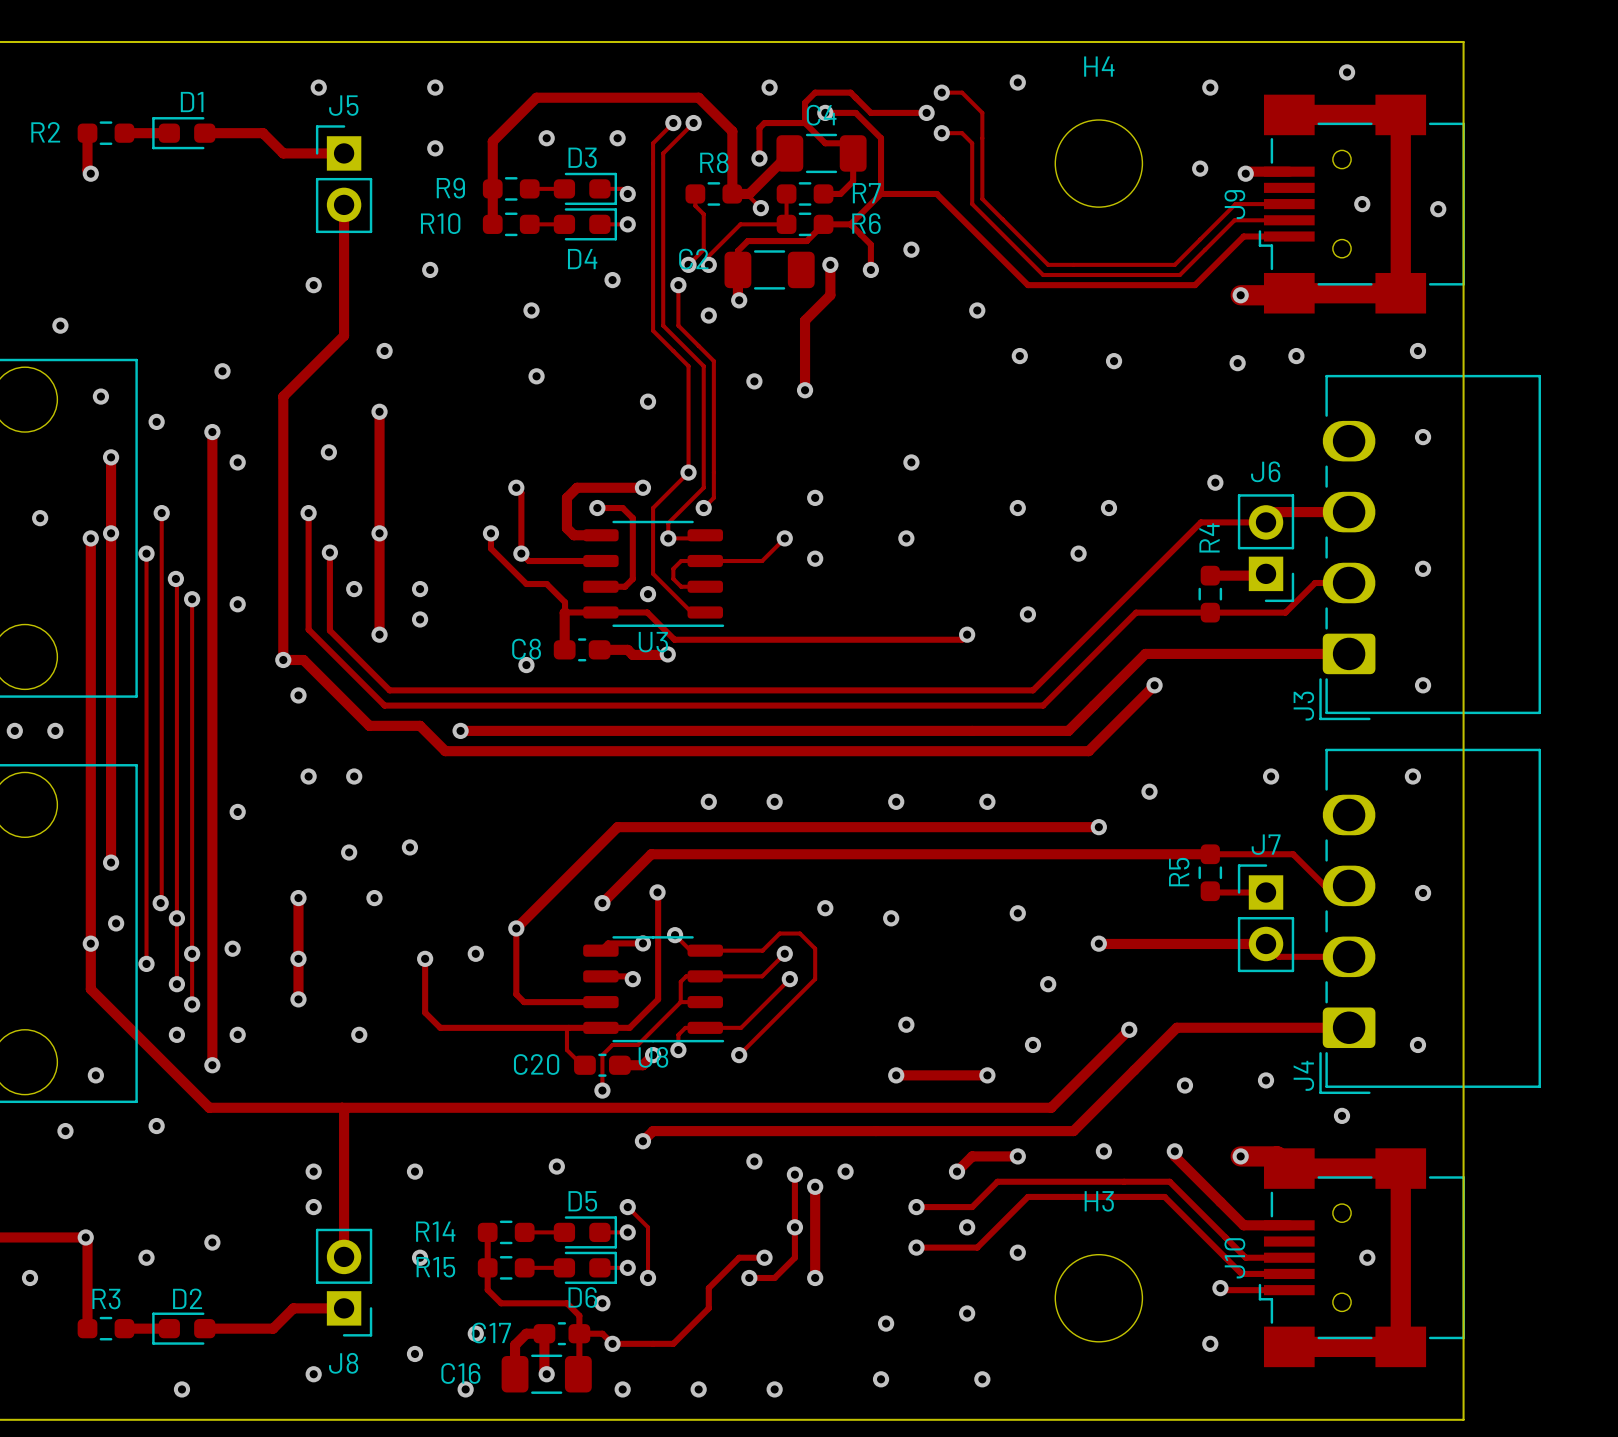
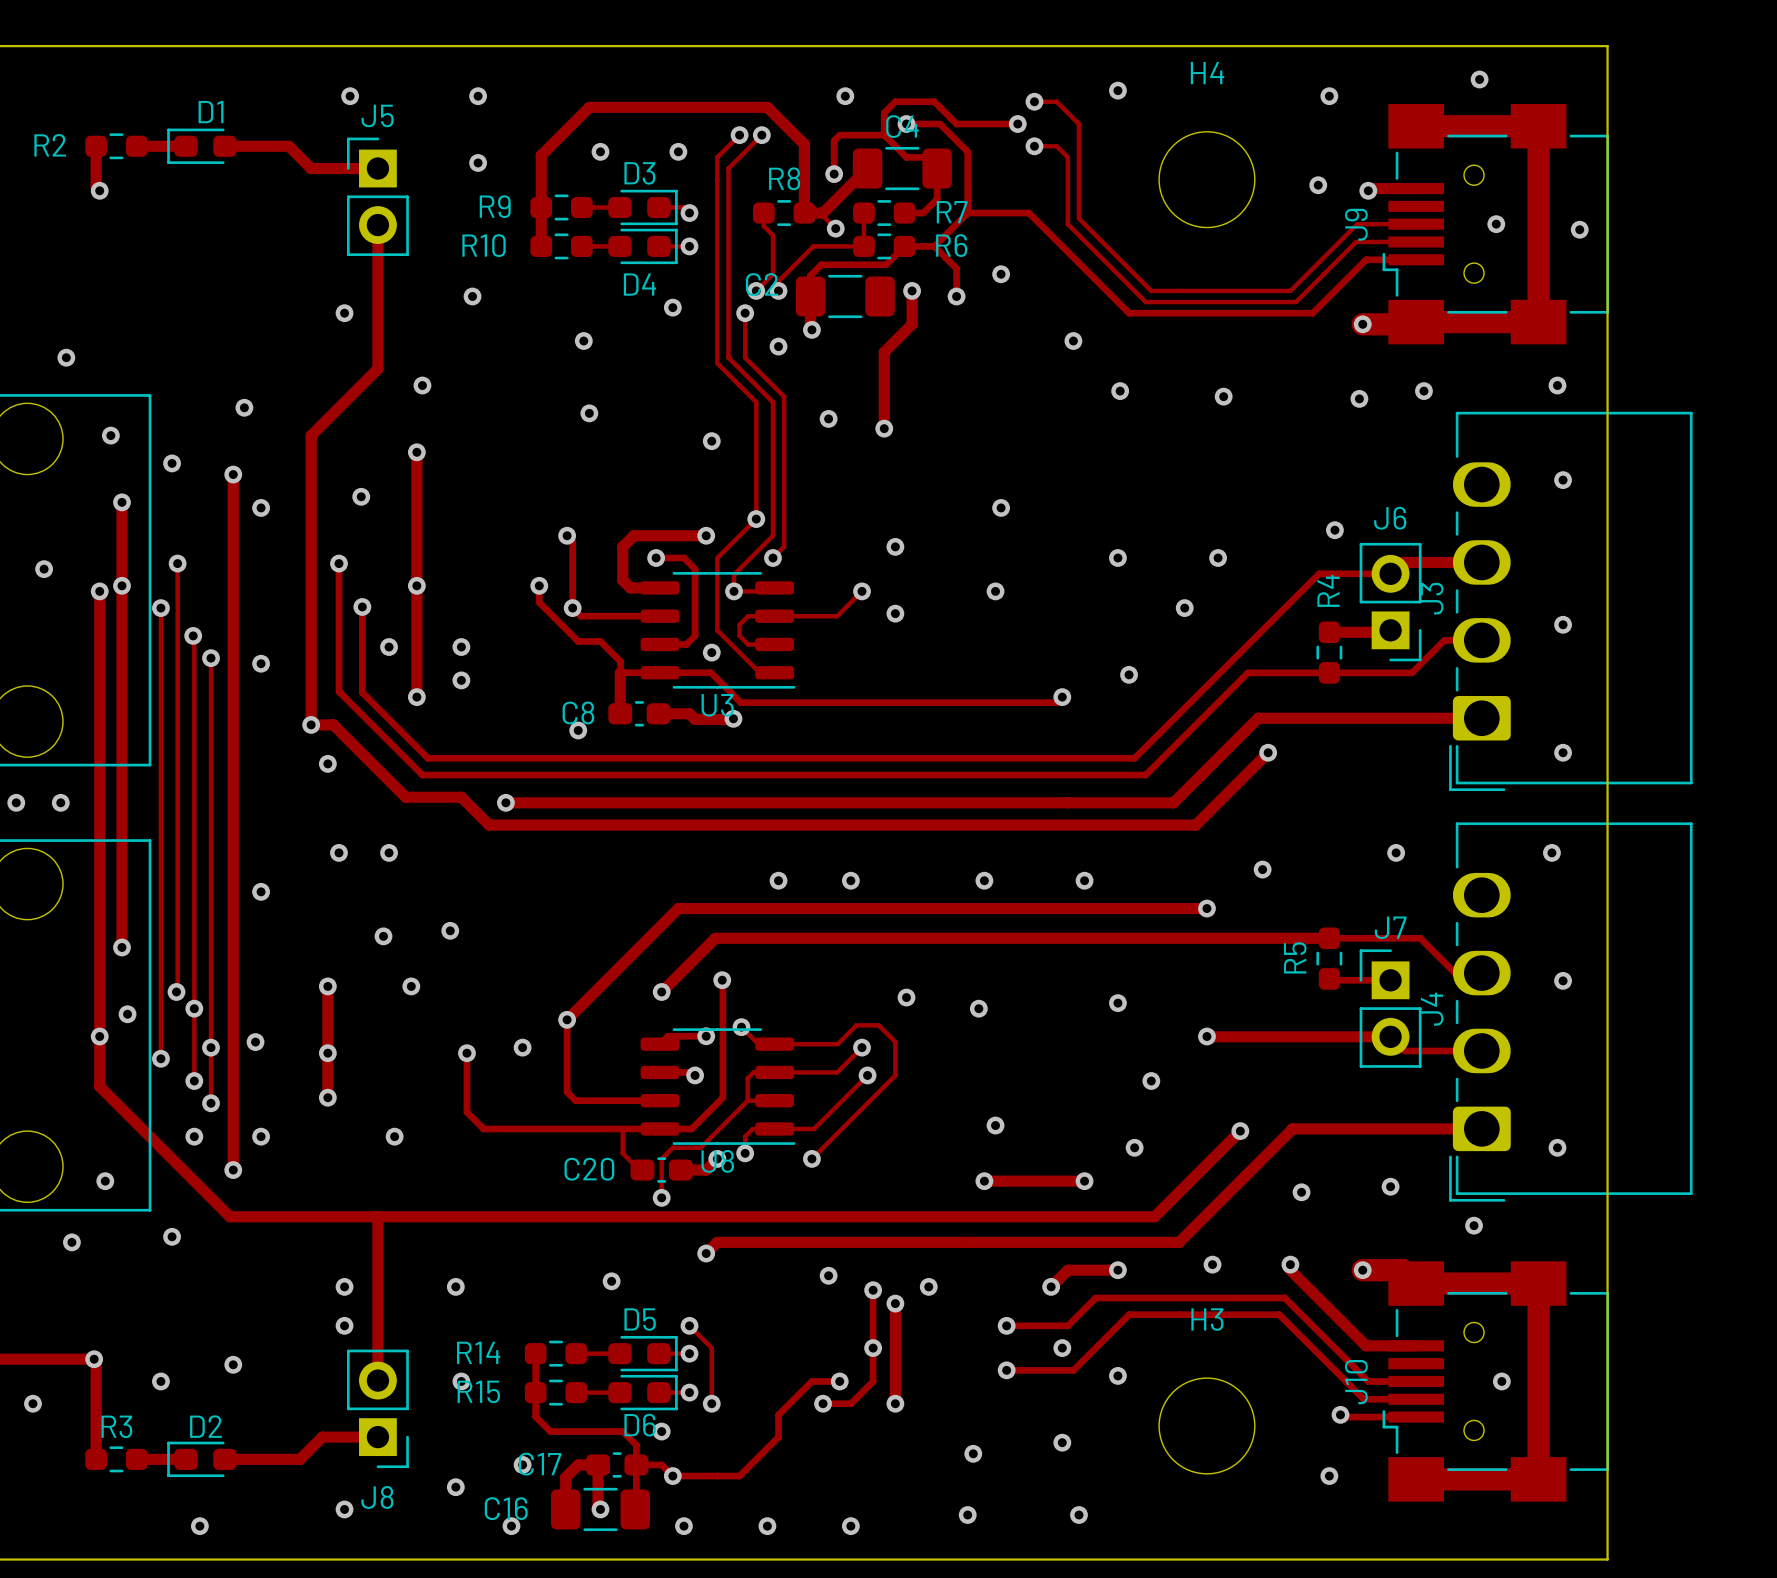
J3 name position: J3 (1303, 706) -> J3 (1432, 598)
J4 name position: J4 (1303, 1075) -> J4 (1432, 1009)

